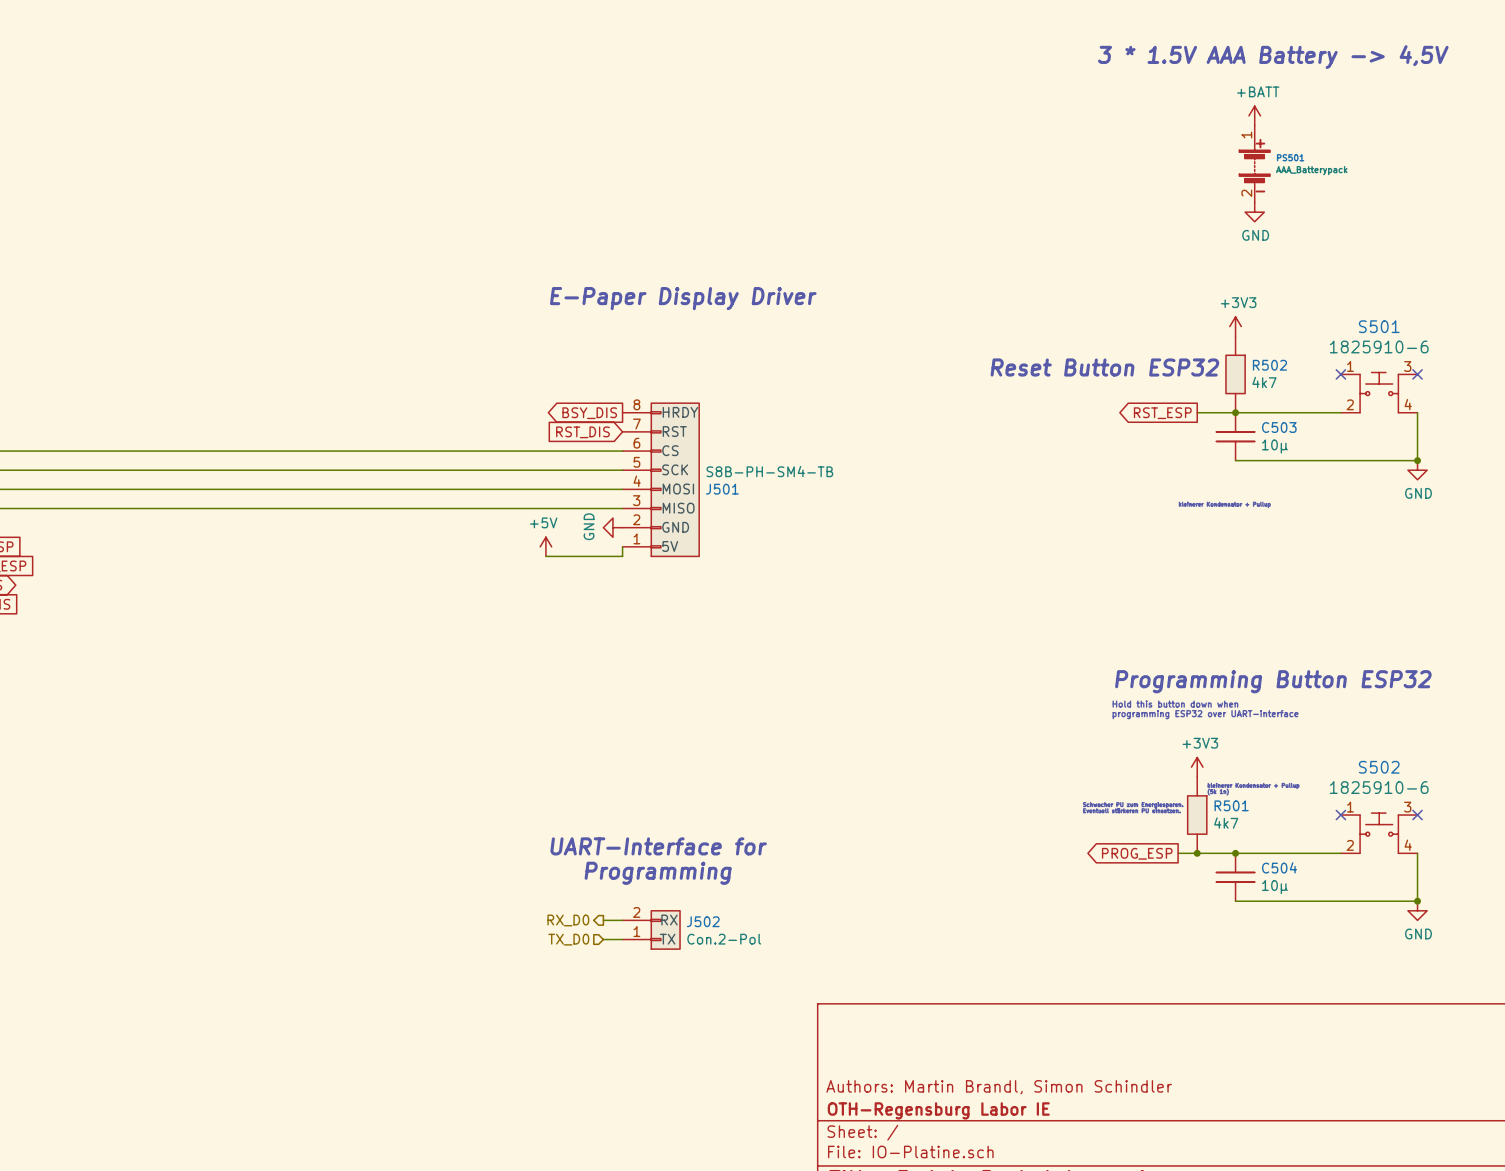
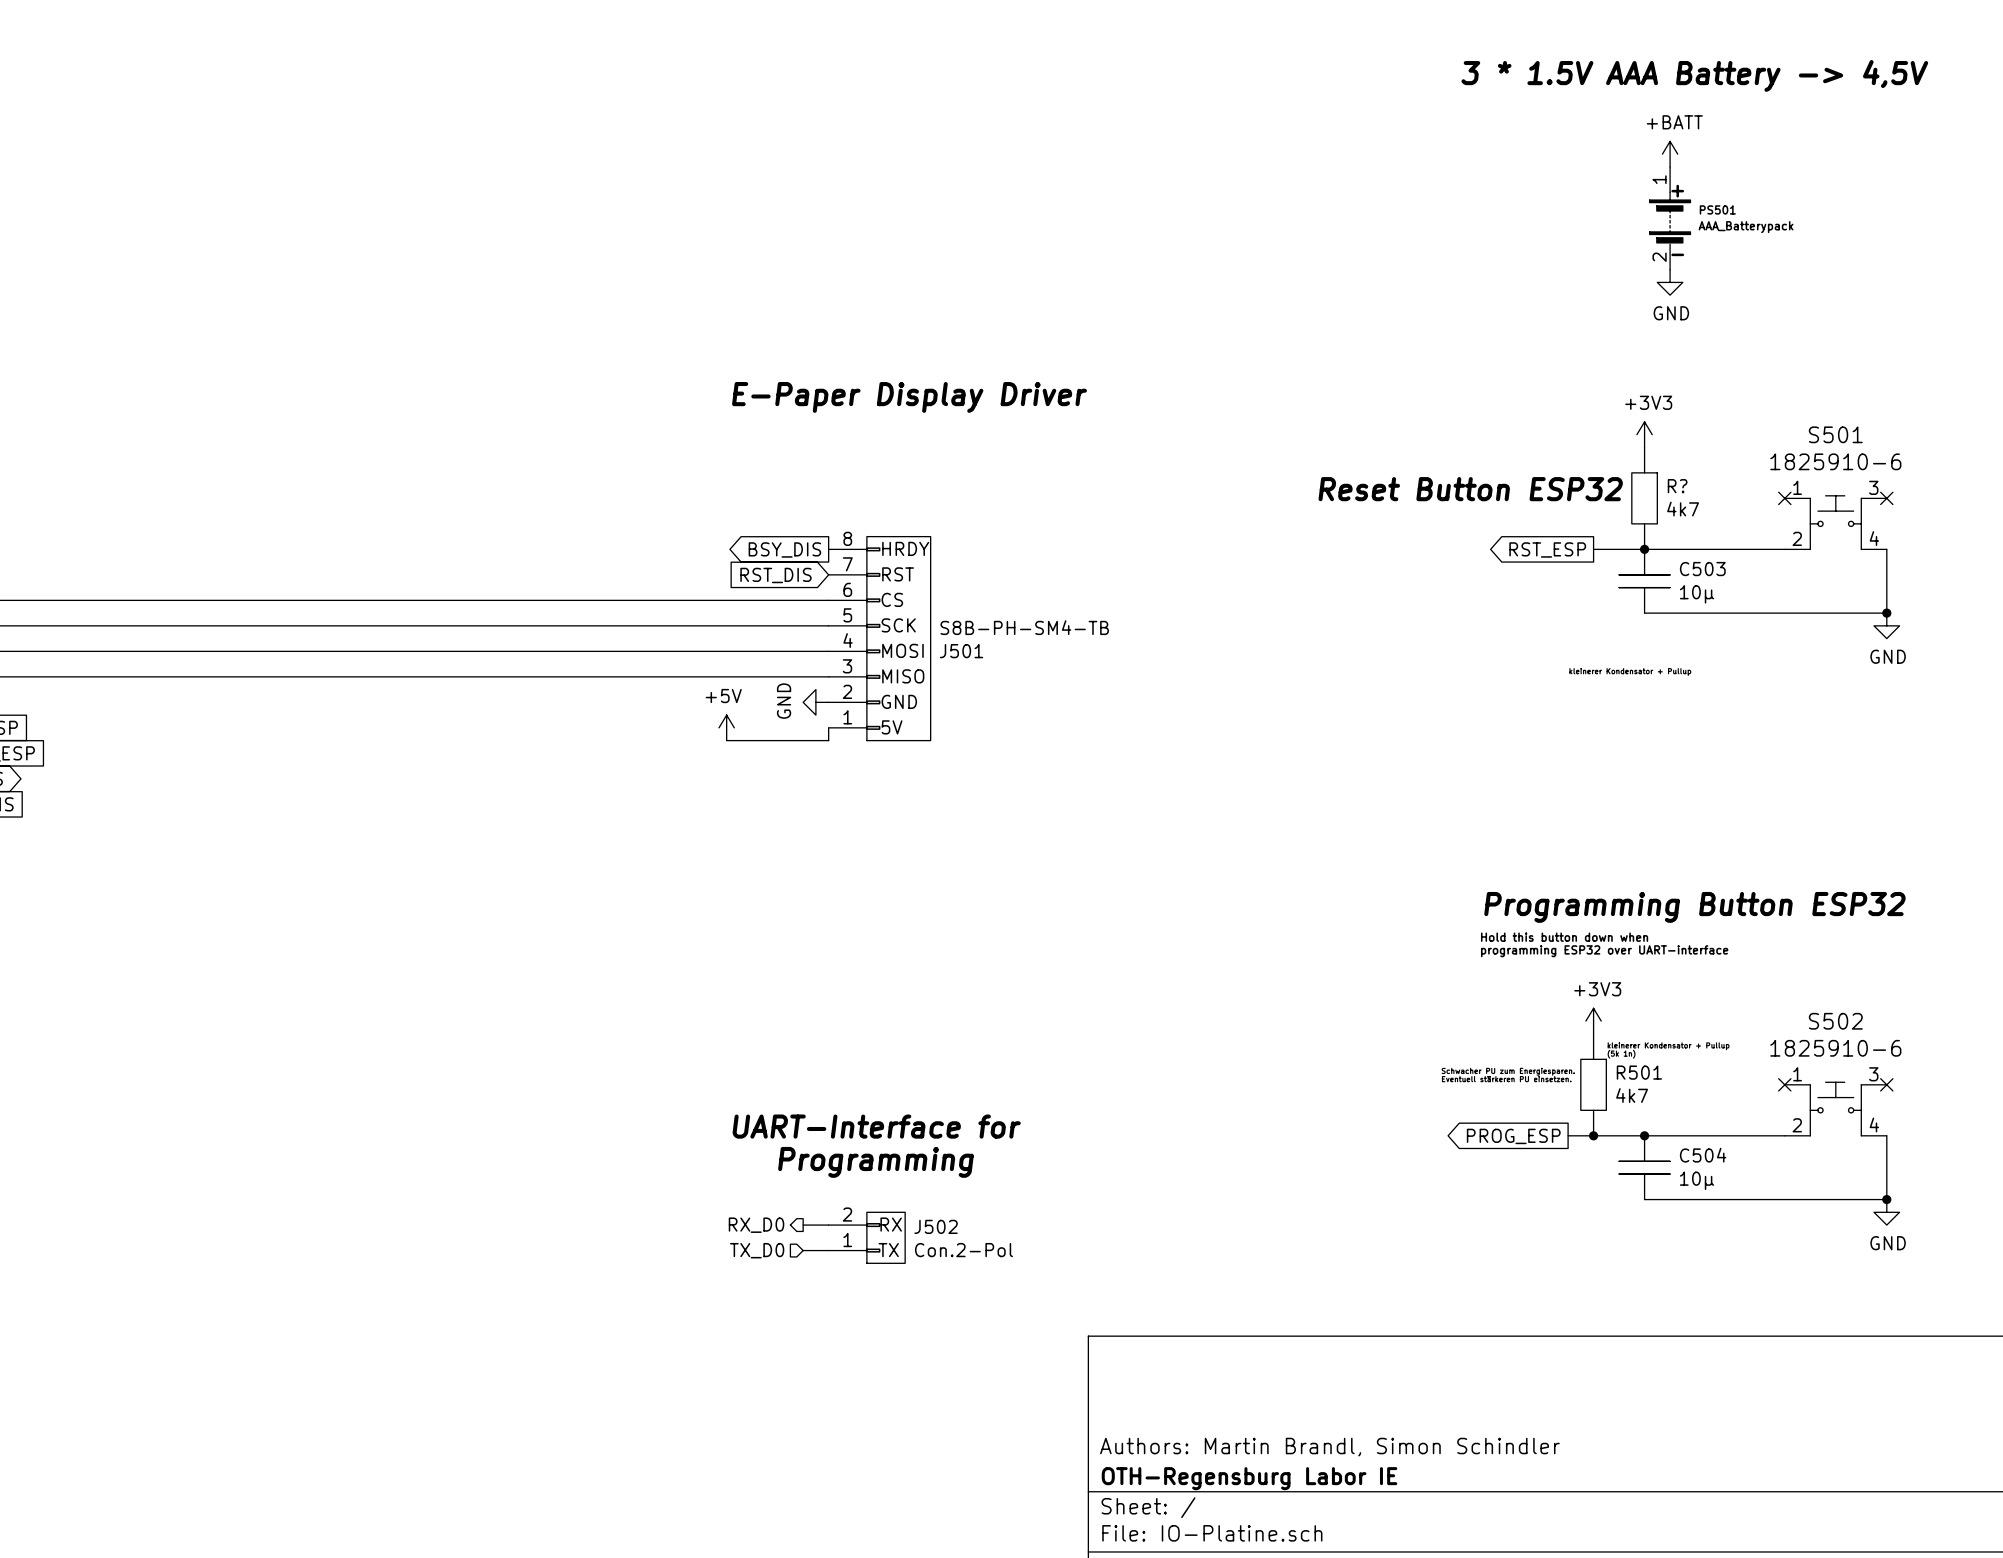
R502 name: R502 (1269, 365) -> R? (1677, 486)

